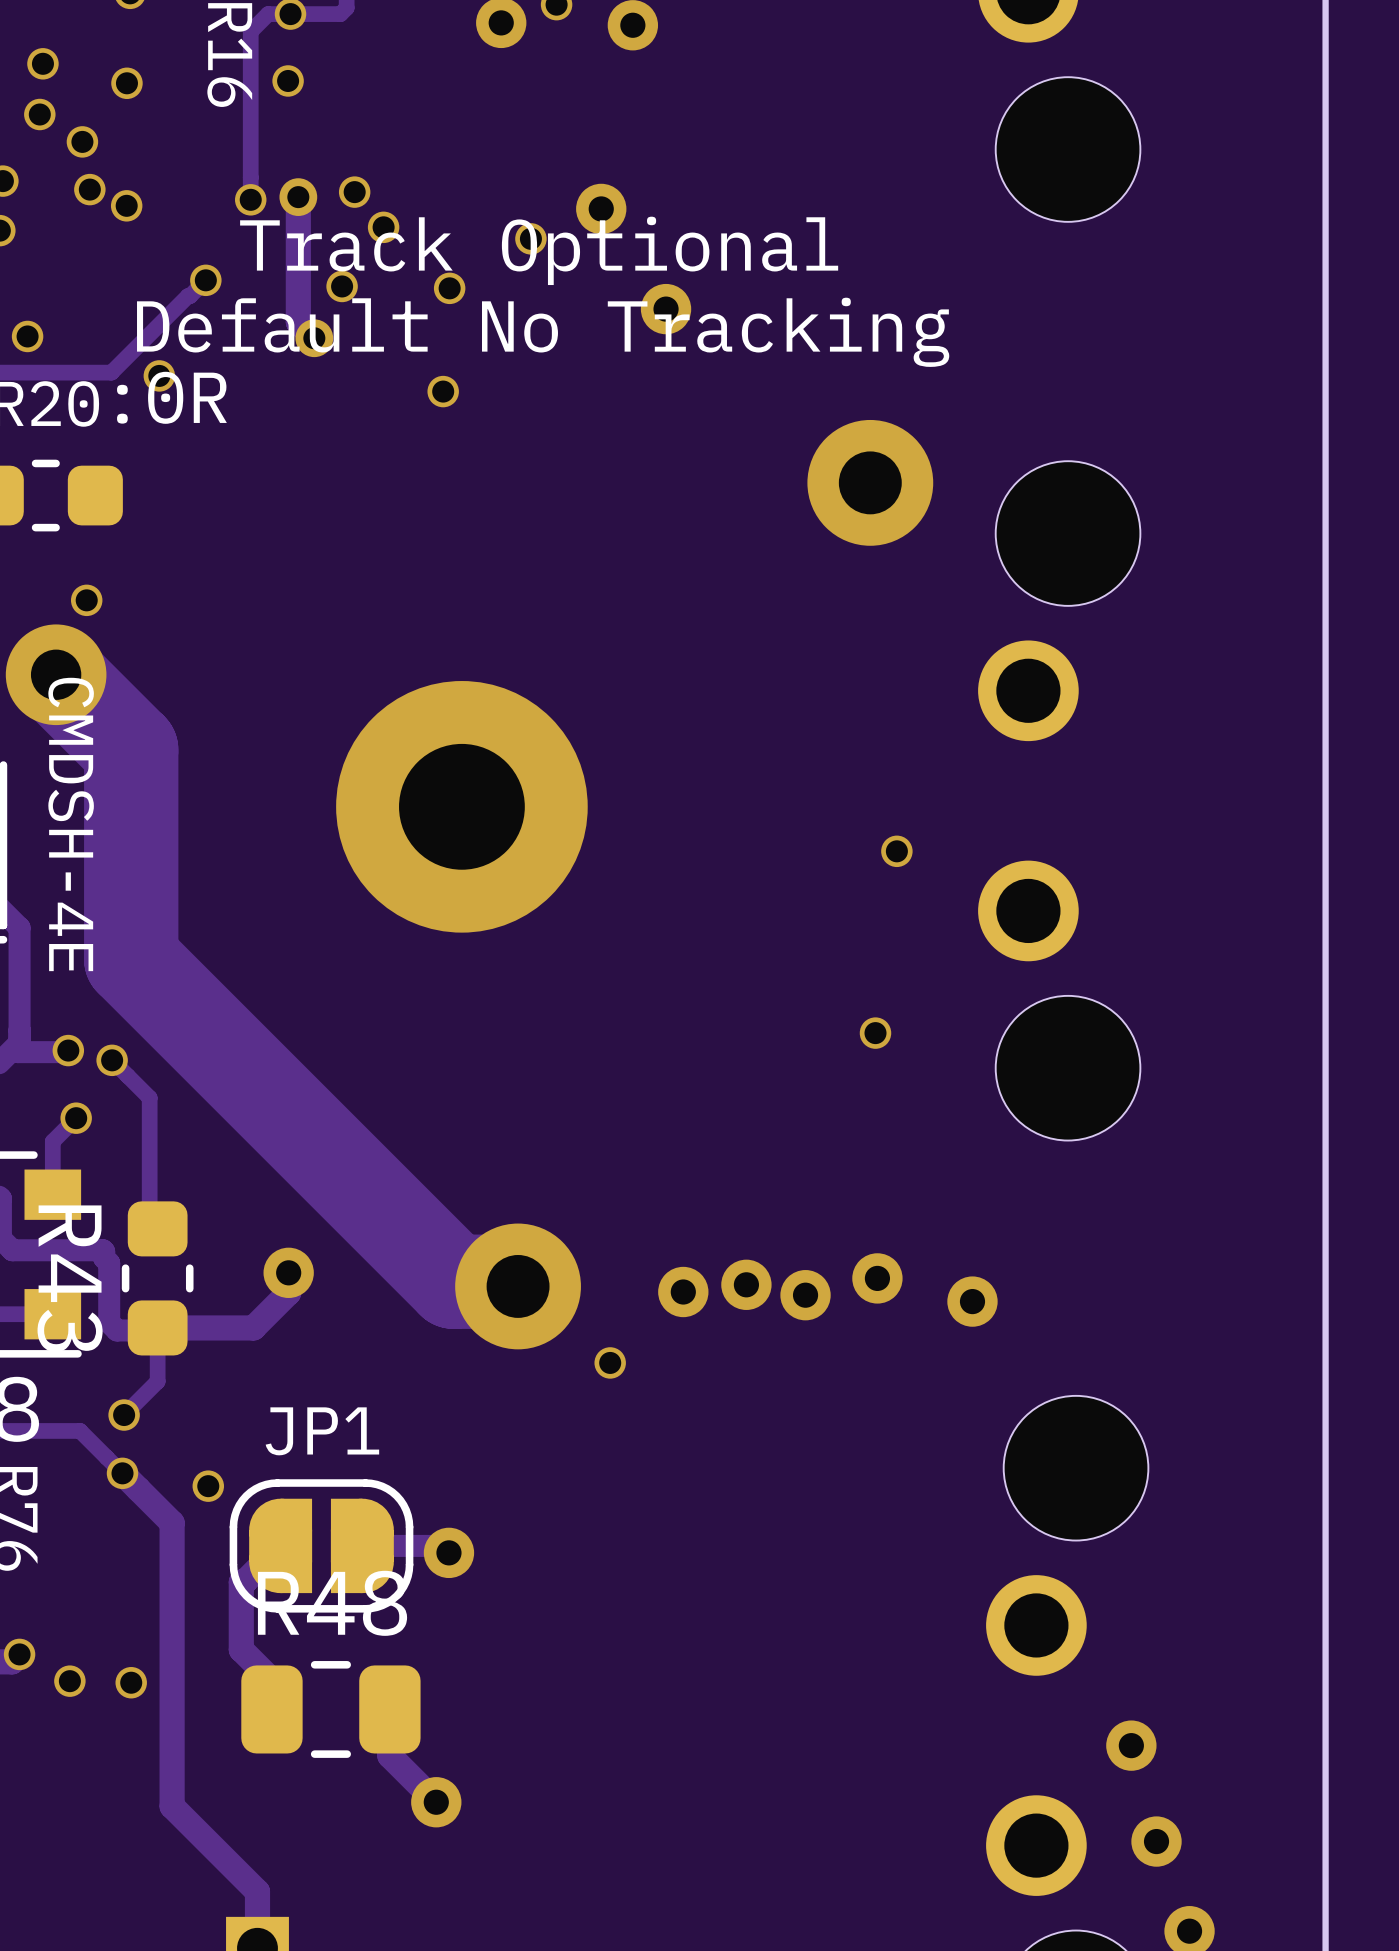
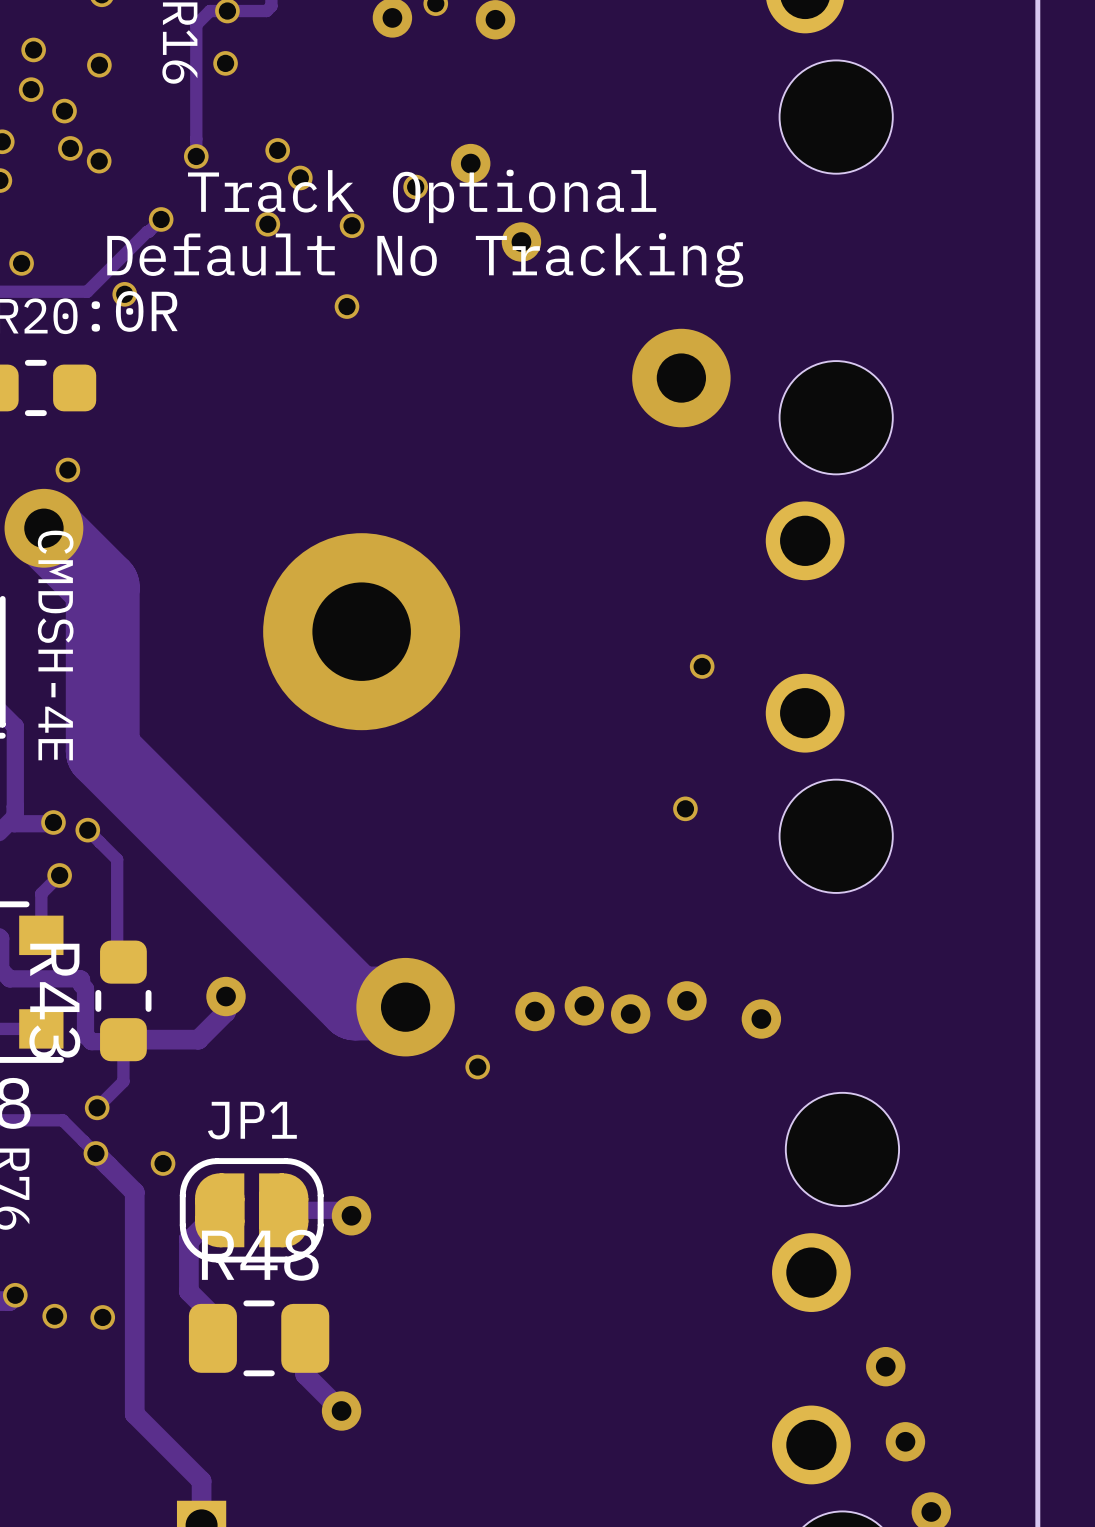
track: (298, 197) (298, 322) (314, 338) -> none
via: (298, 197) -> none
via: (314, 338) -> none

